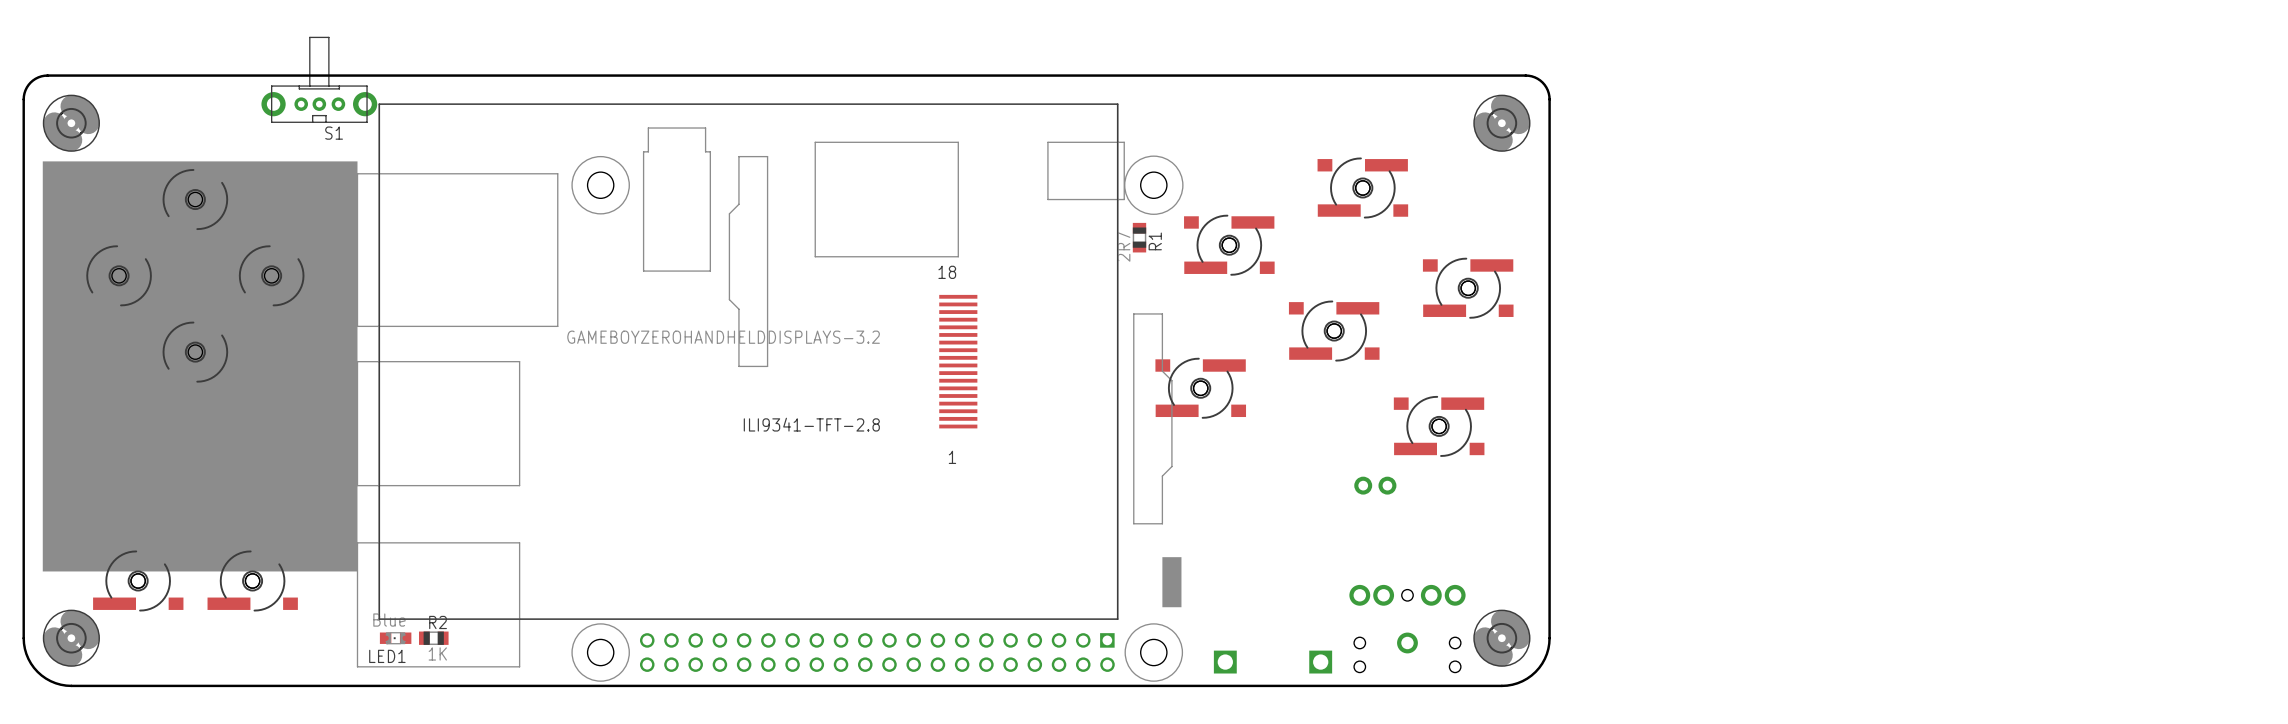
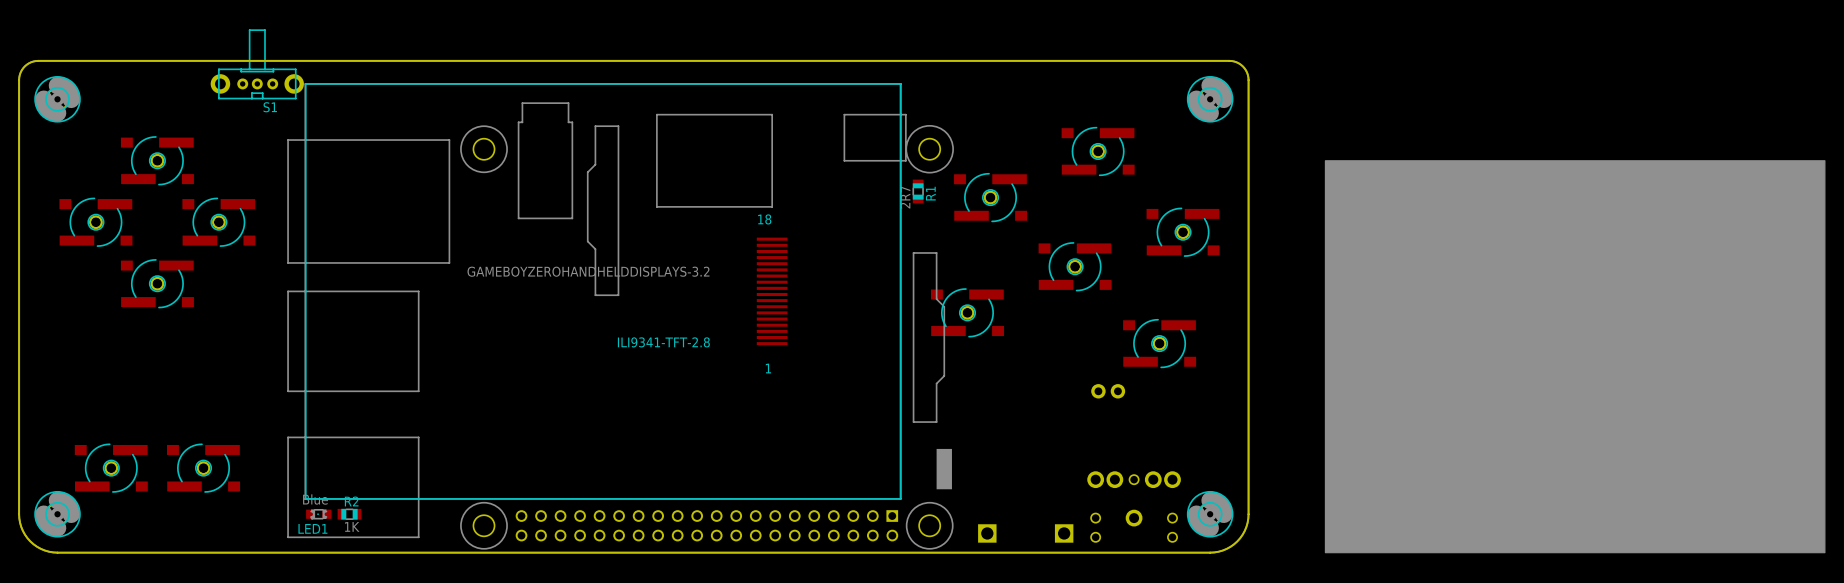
drawing: [42, 161, 358, 572] -> none
drawing: none -> [1324, 160, 1826, 554]

